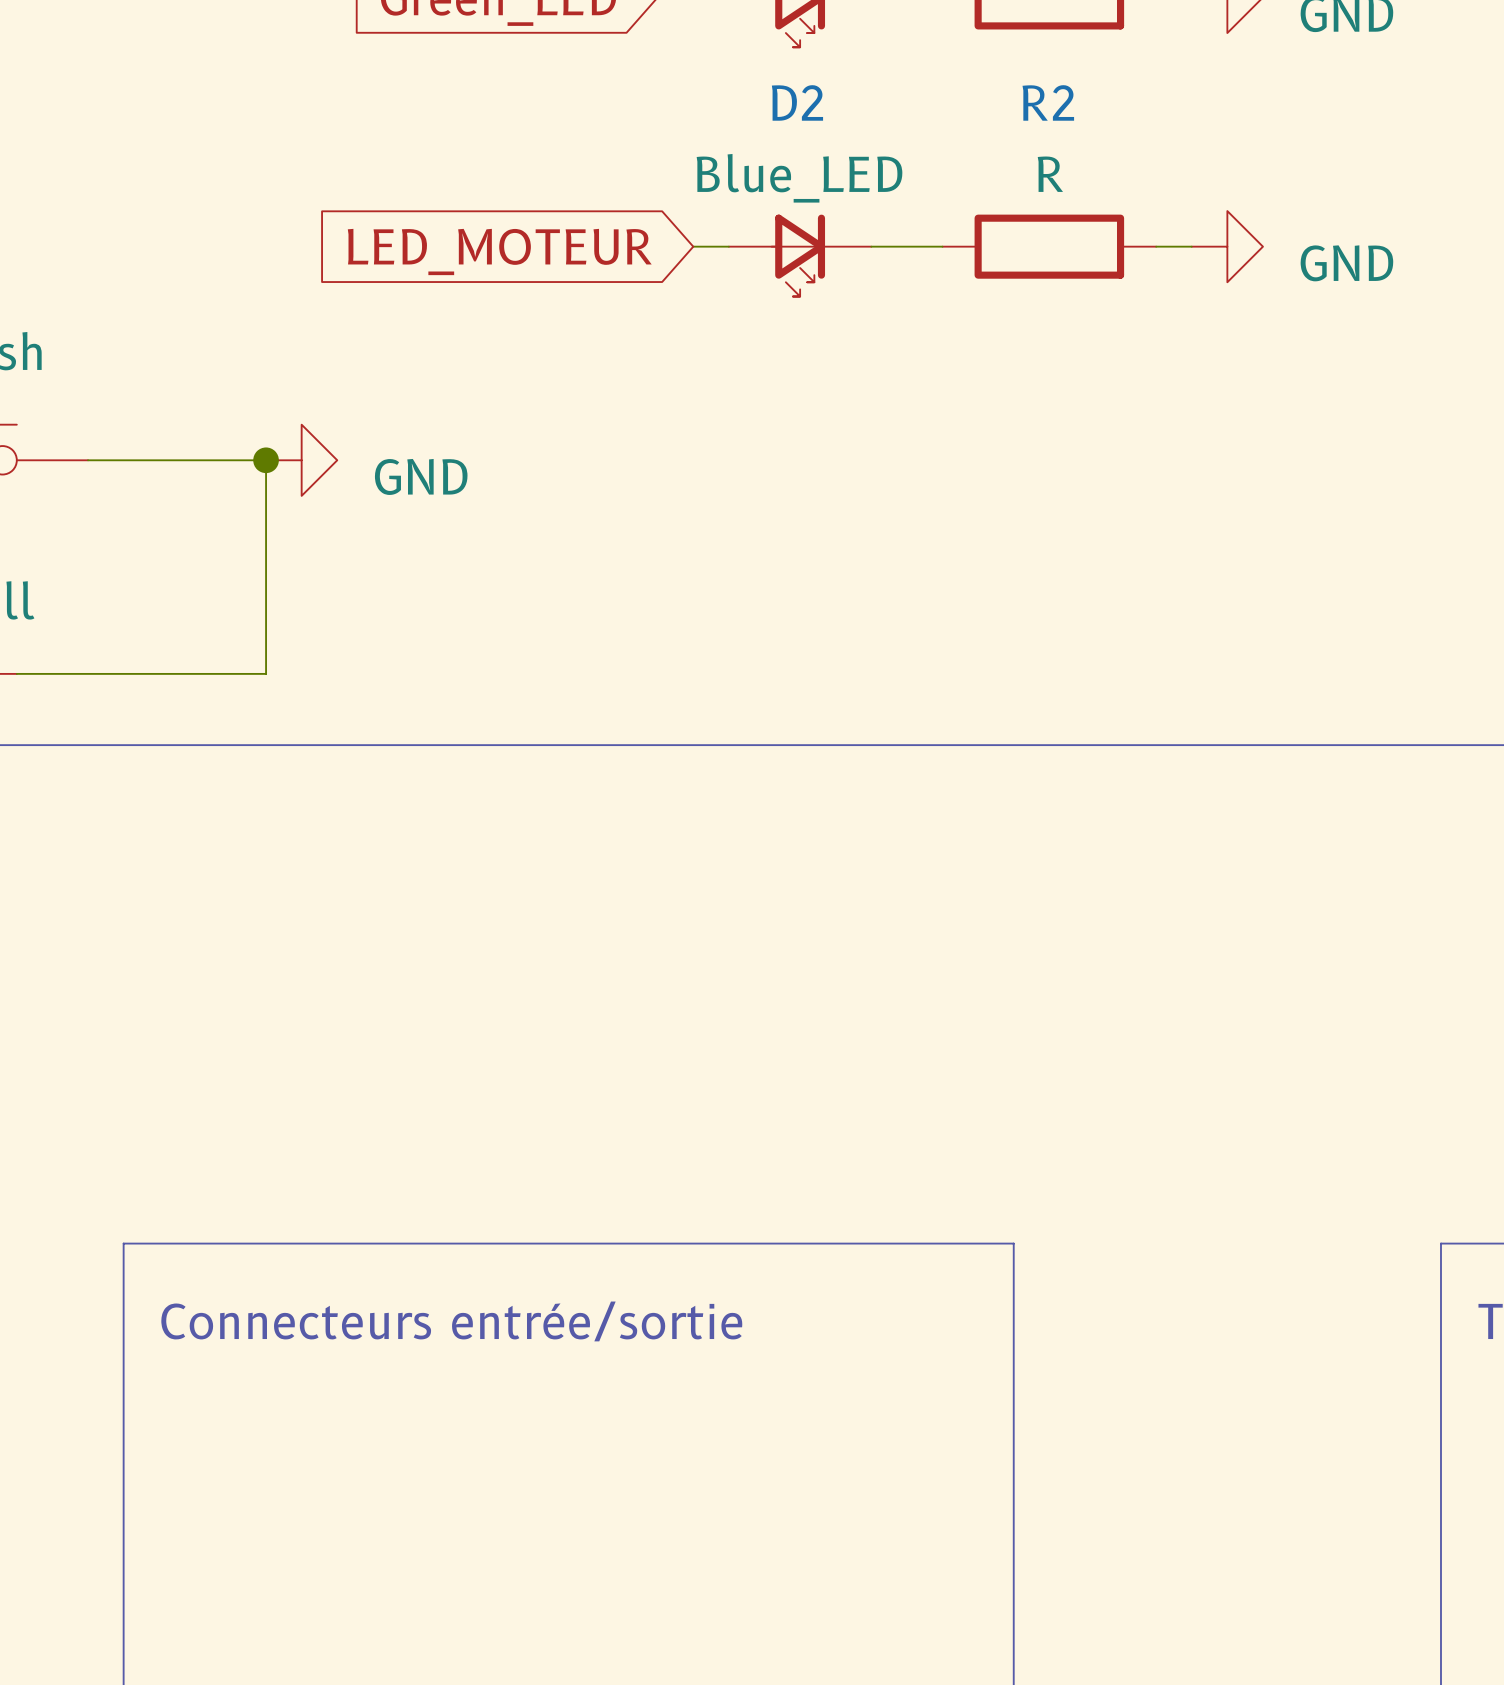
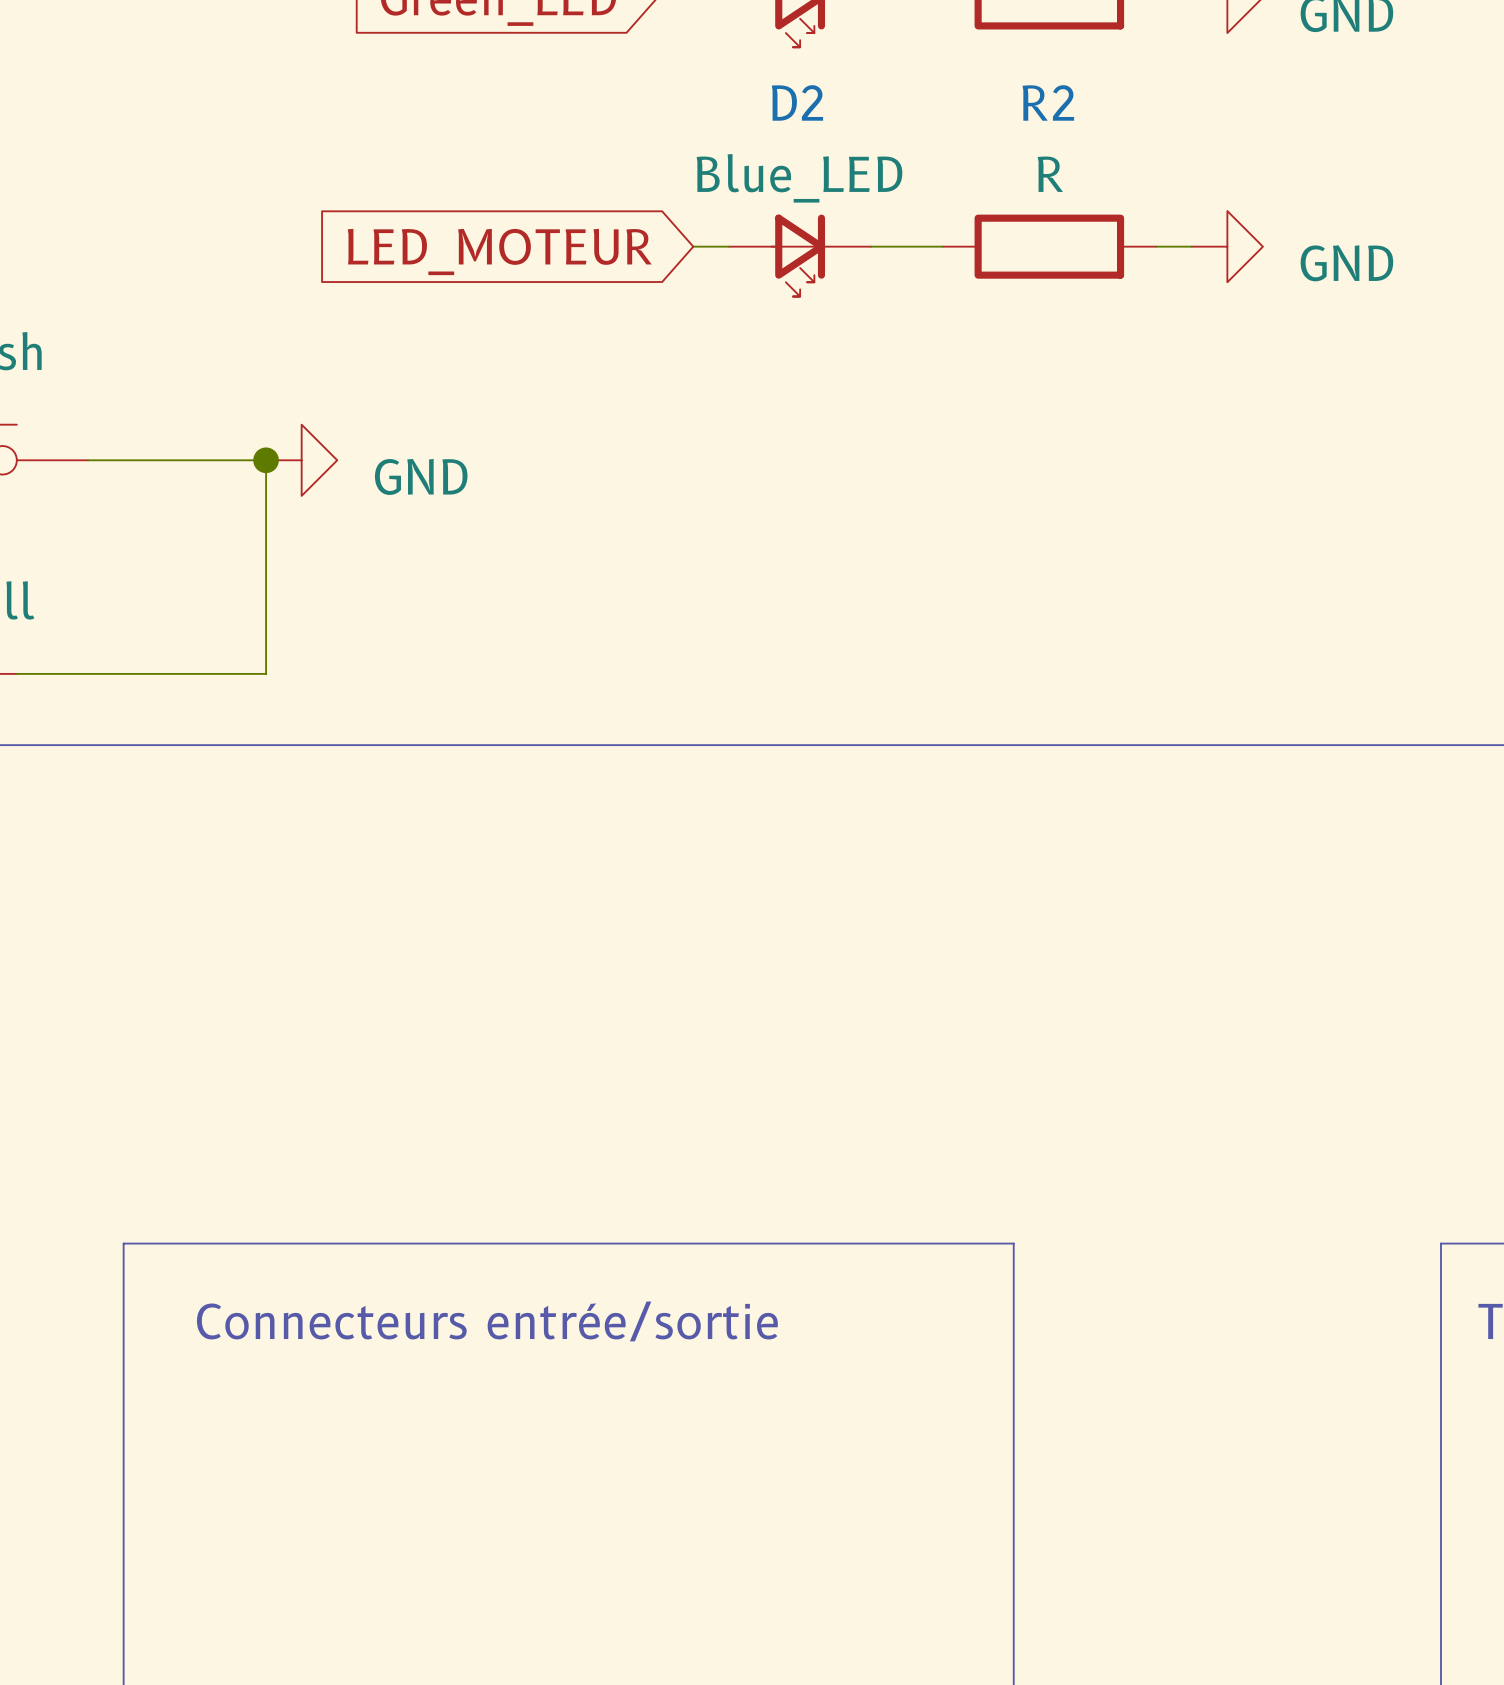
text position: Connecteurs entrée/sortie (451, 1321) -> Connecteurs entrée/sortie (487, 1321)

